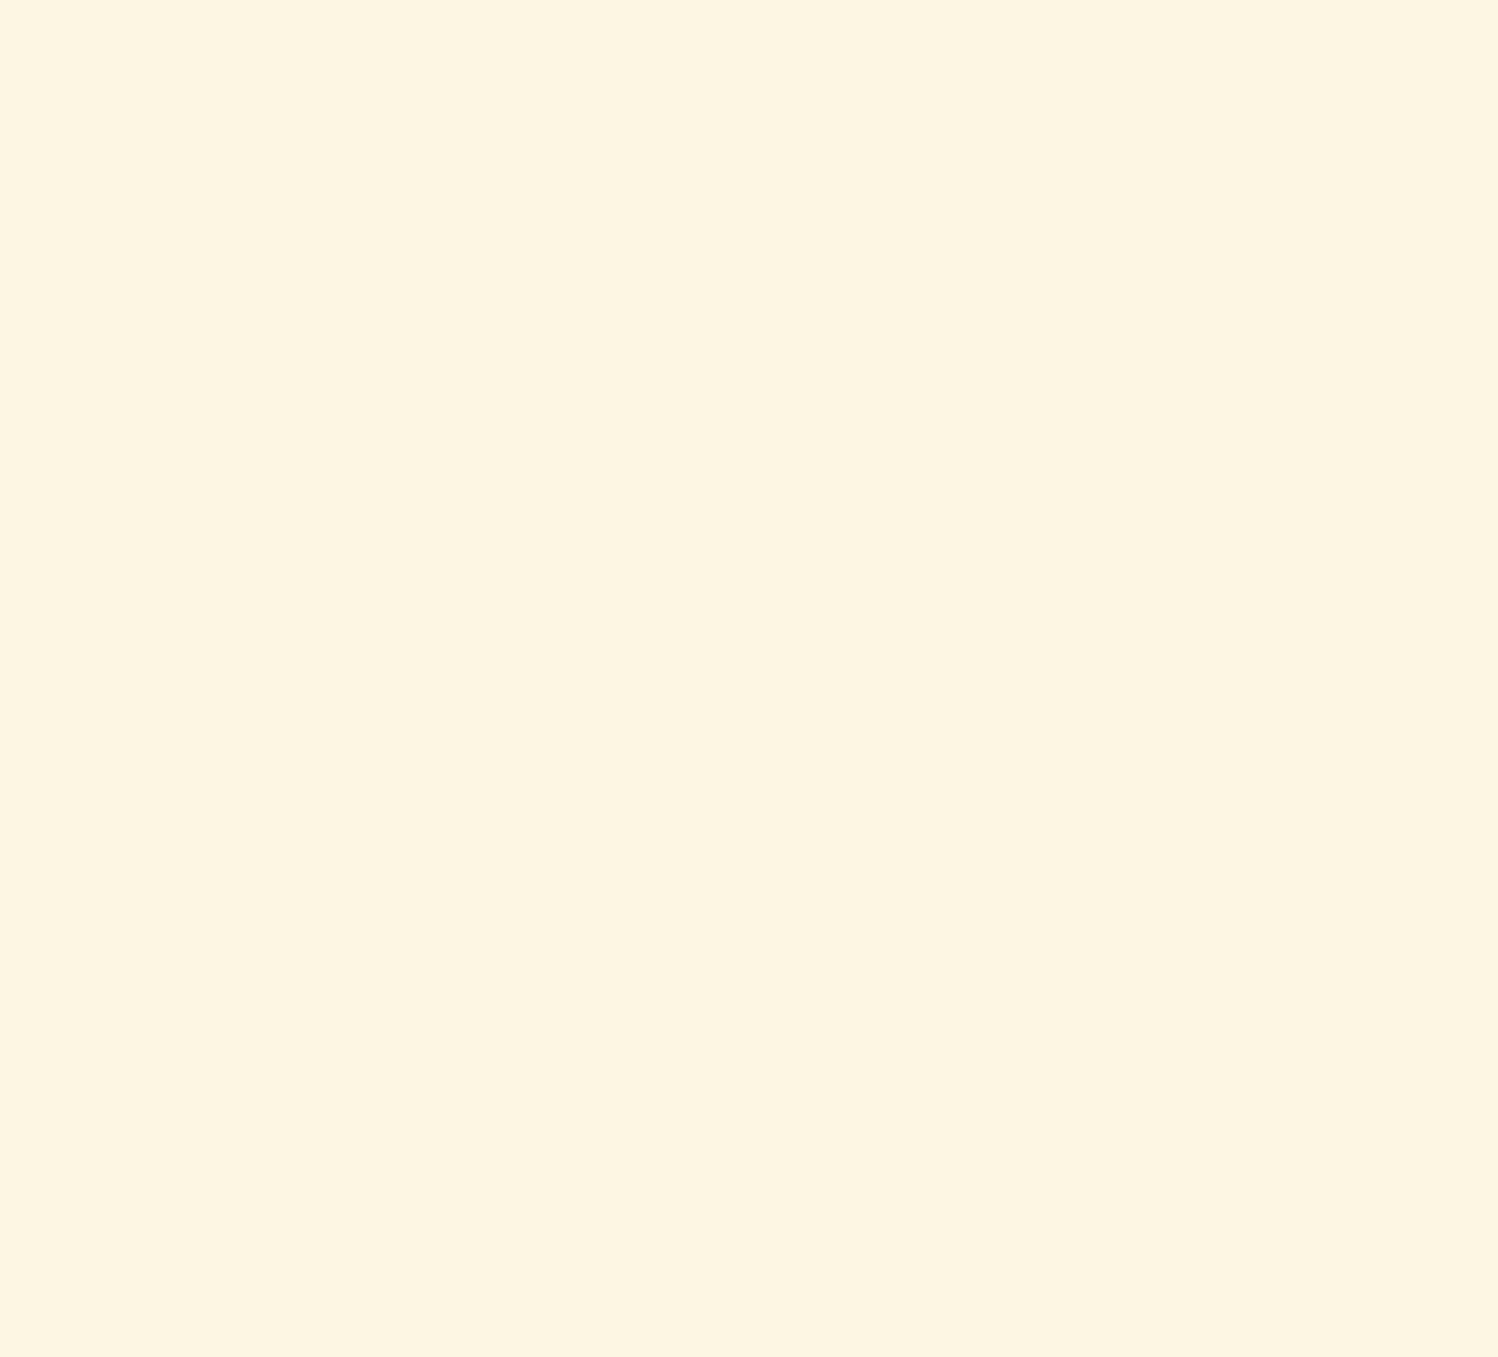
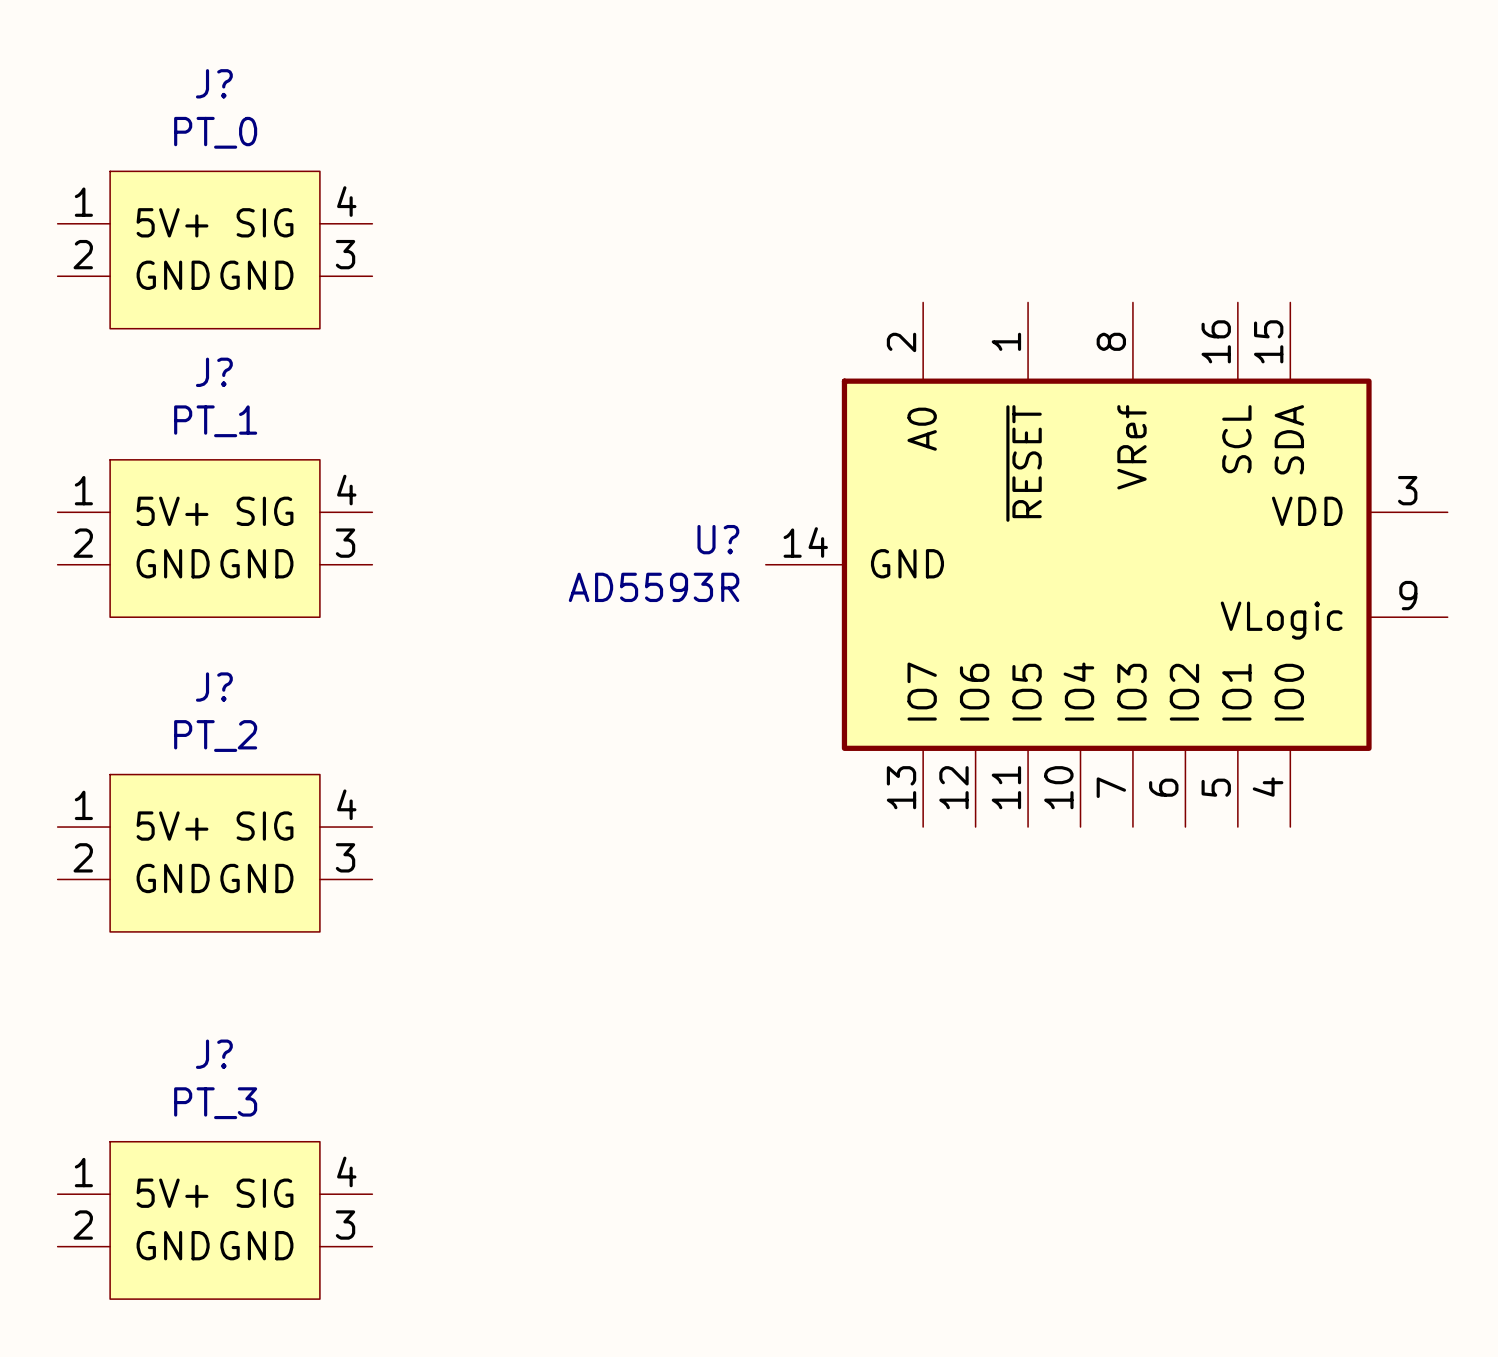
J?: none -> PT_0 (215, 250)
J?: none -> PT_1 (215, 538)
U?: none -> AD5593R (1106, 564)
J?: none -> PT_2 (215, 853)
J?: none -> PT_3 (215, 1220)

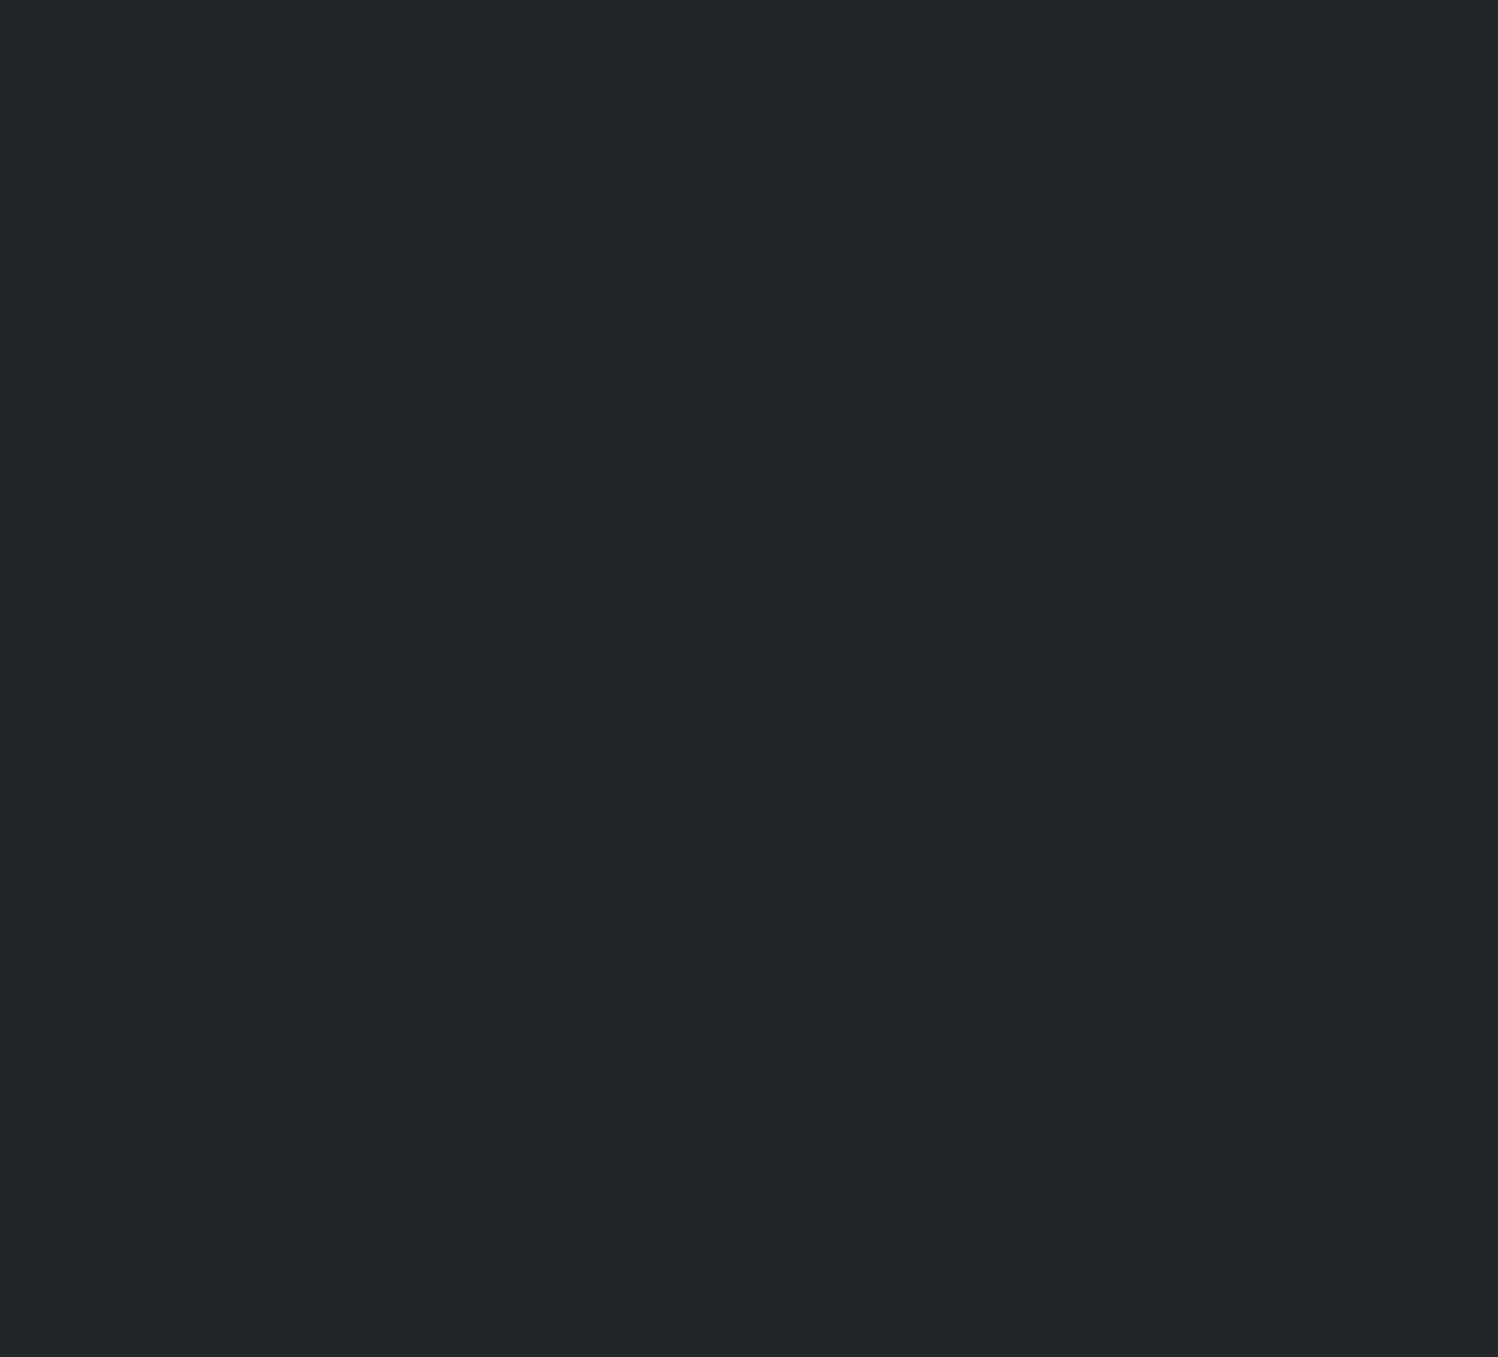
J?: PT_0 (215, 250) -> none
J?: PT_1 (215, 538) -> none
U?: AD5593R (1106, 564) -> none
J?: PT_2 (215, 853) -> none
J?: PT_3 (215, 1220) -> none

